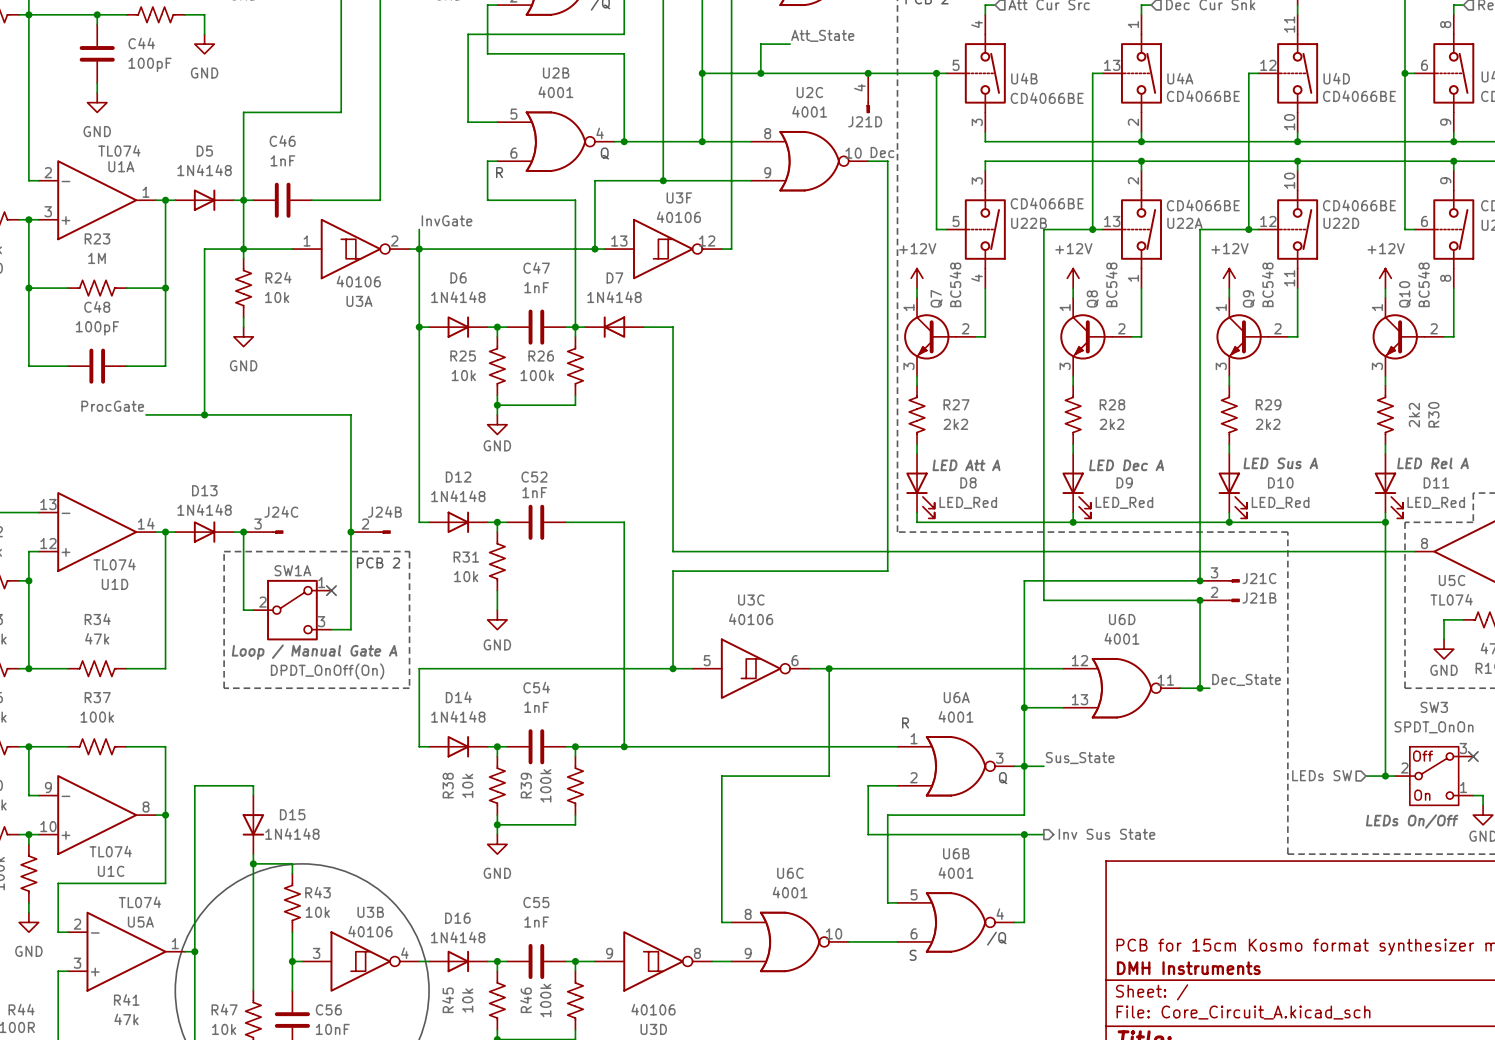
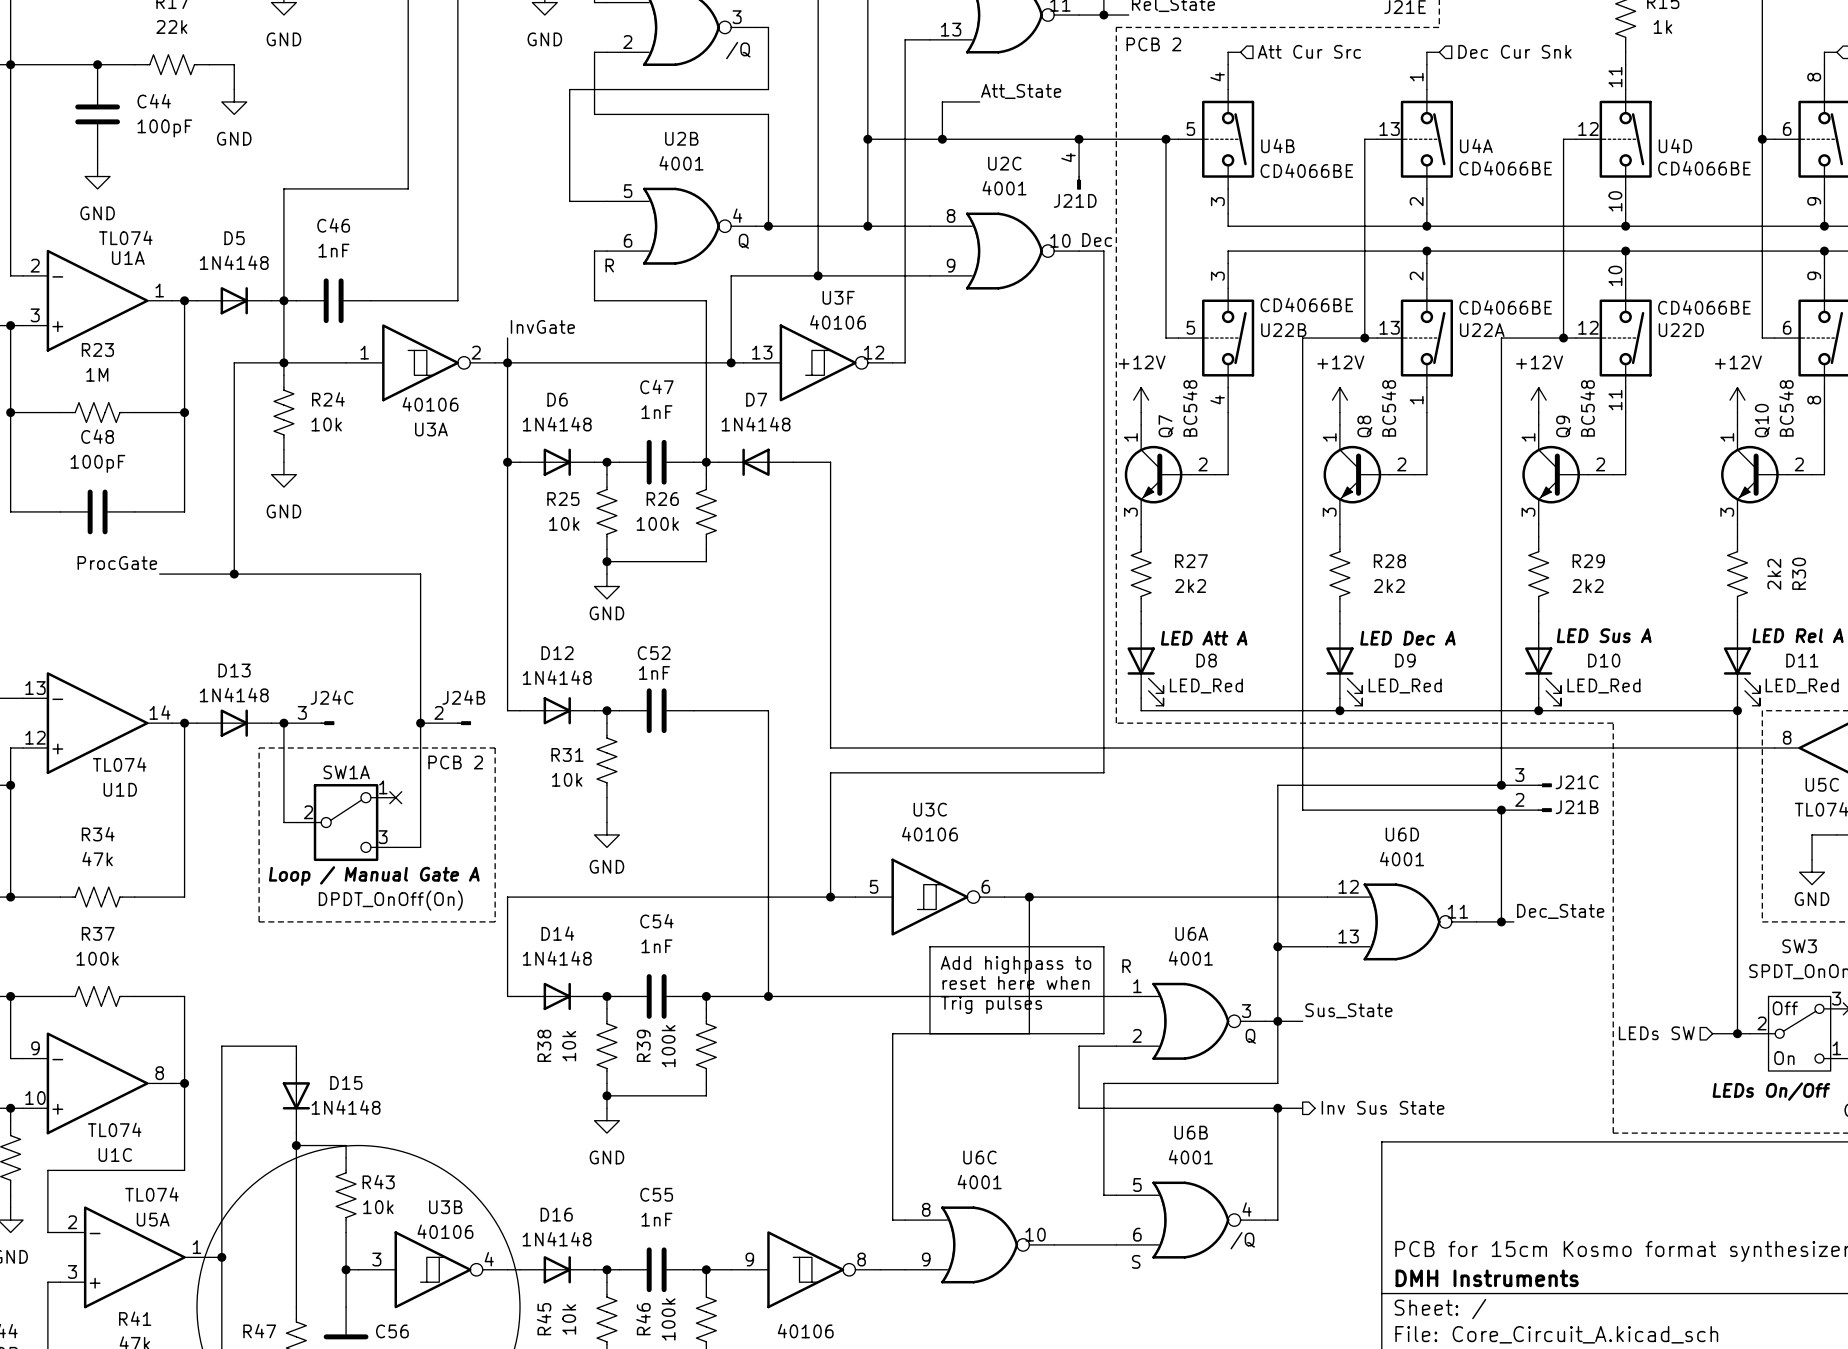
line: none -> (929, 946) (1103, 946) (1103, 1033) (929, 1033) (929, 946)
text: none -> Add highpass to (1015, 964)
text: none -> reset here when (1015, 982)
text: none -> Trig pulses (991, 1004)

